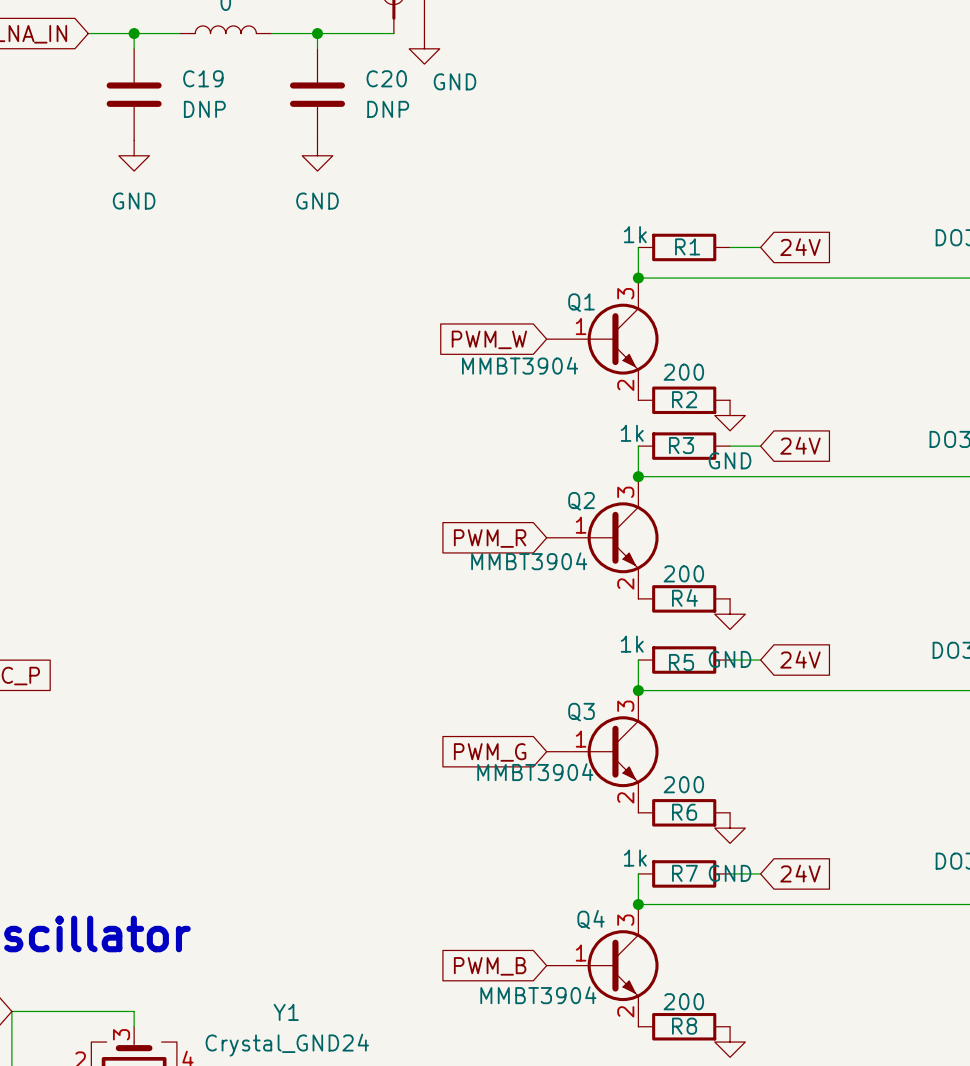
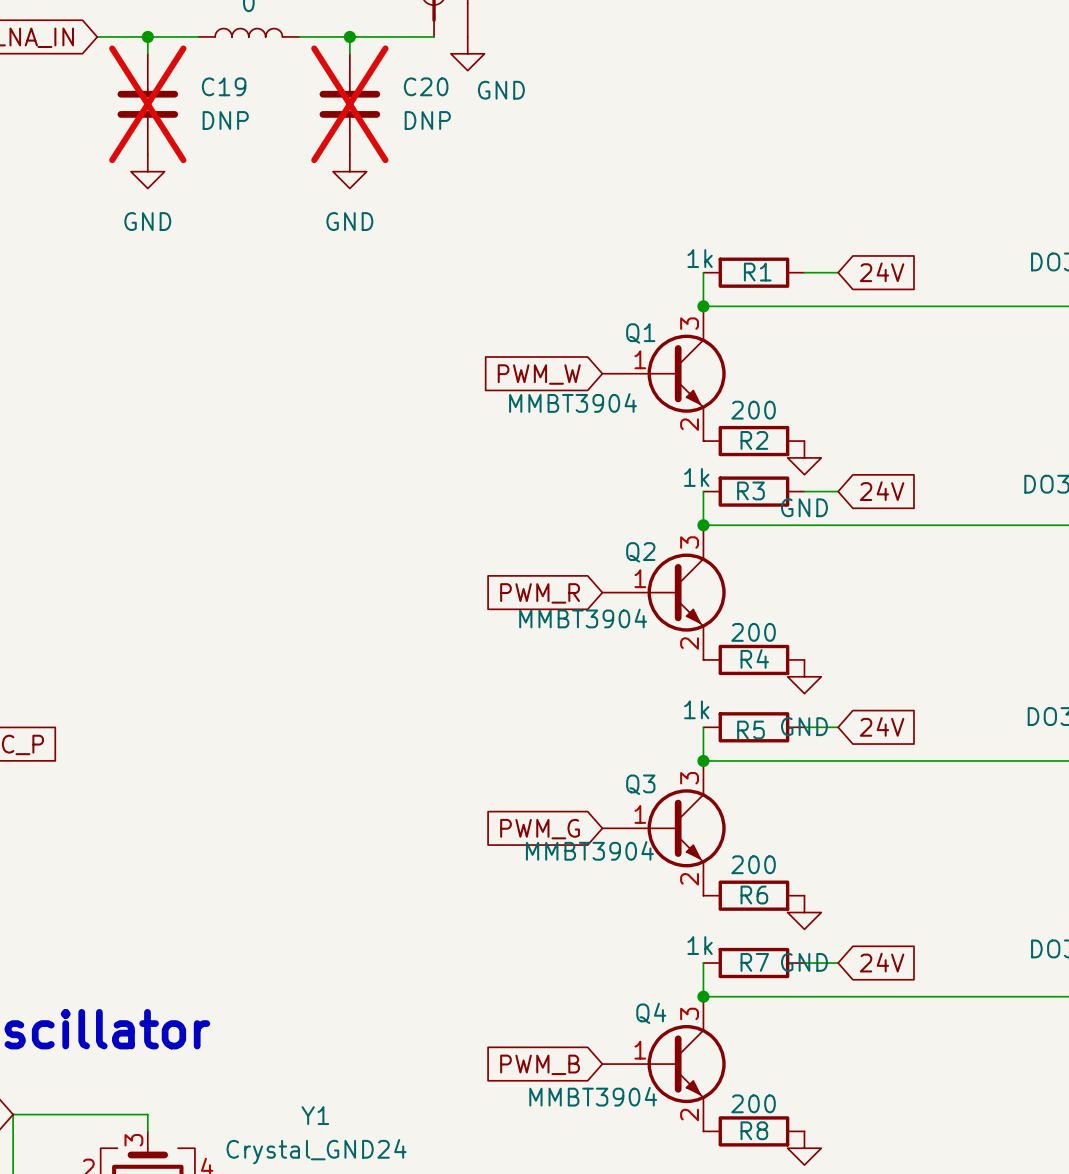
C19 do-not-place cross: none -> (147, 104)
C20 do-not-place cross: none -> (349, 104)

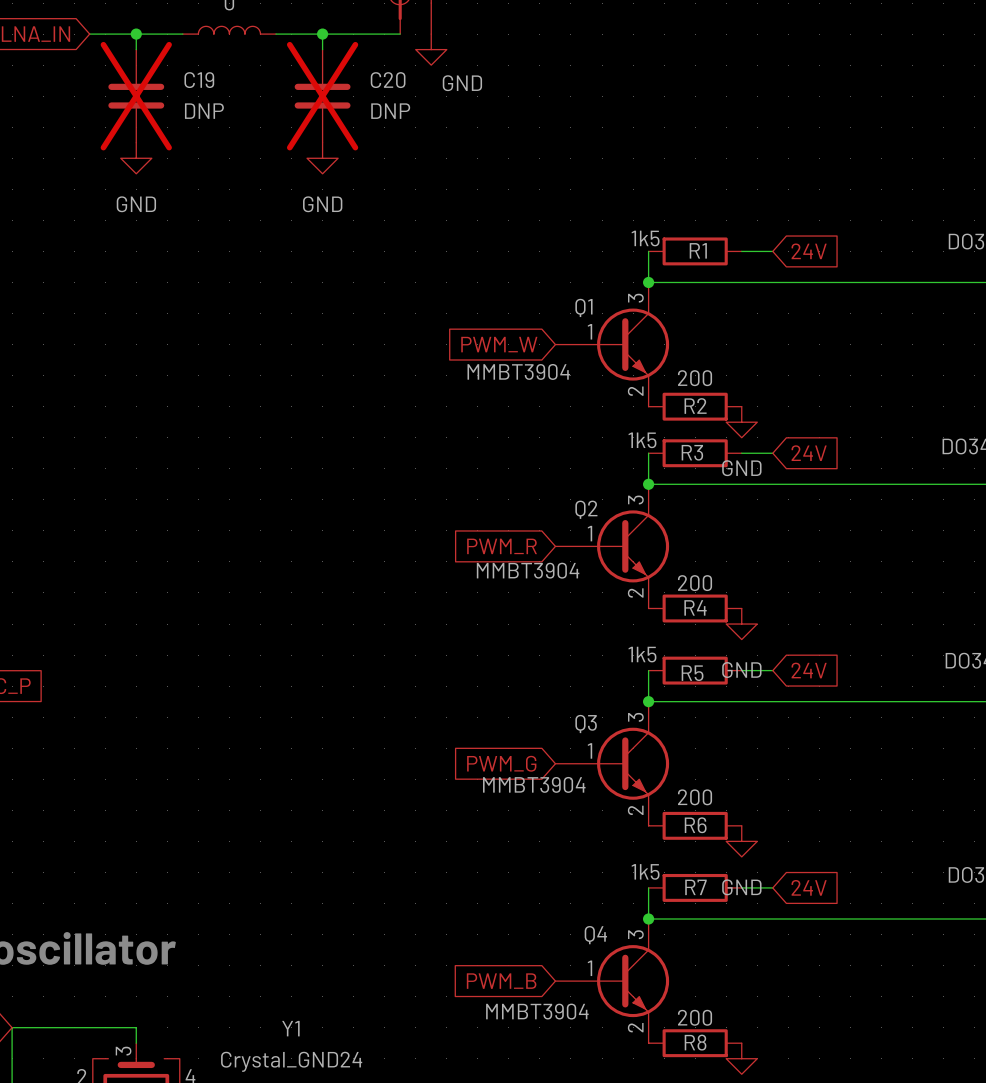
R1 value: 1k (700, 258) -> 1k5 (645, 238)
R3 value: 1k (696, 477) -> 1k5 (642, 440)
R5 value: 1k (696, 709) -> 1k5 (642, 654)
R7 value: 1k (700, 945) -> 1k5 (645, 871)

